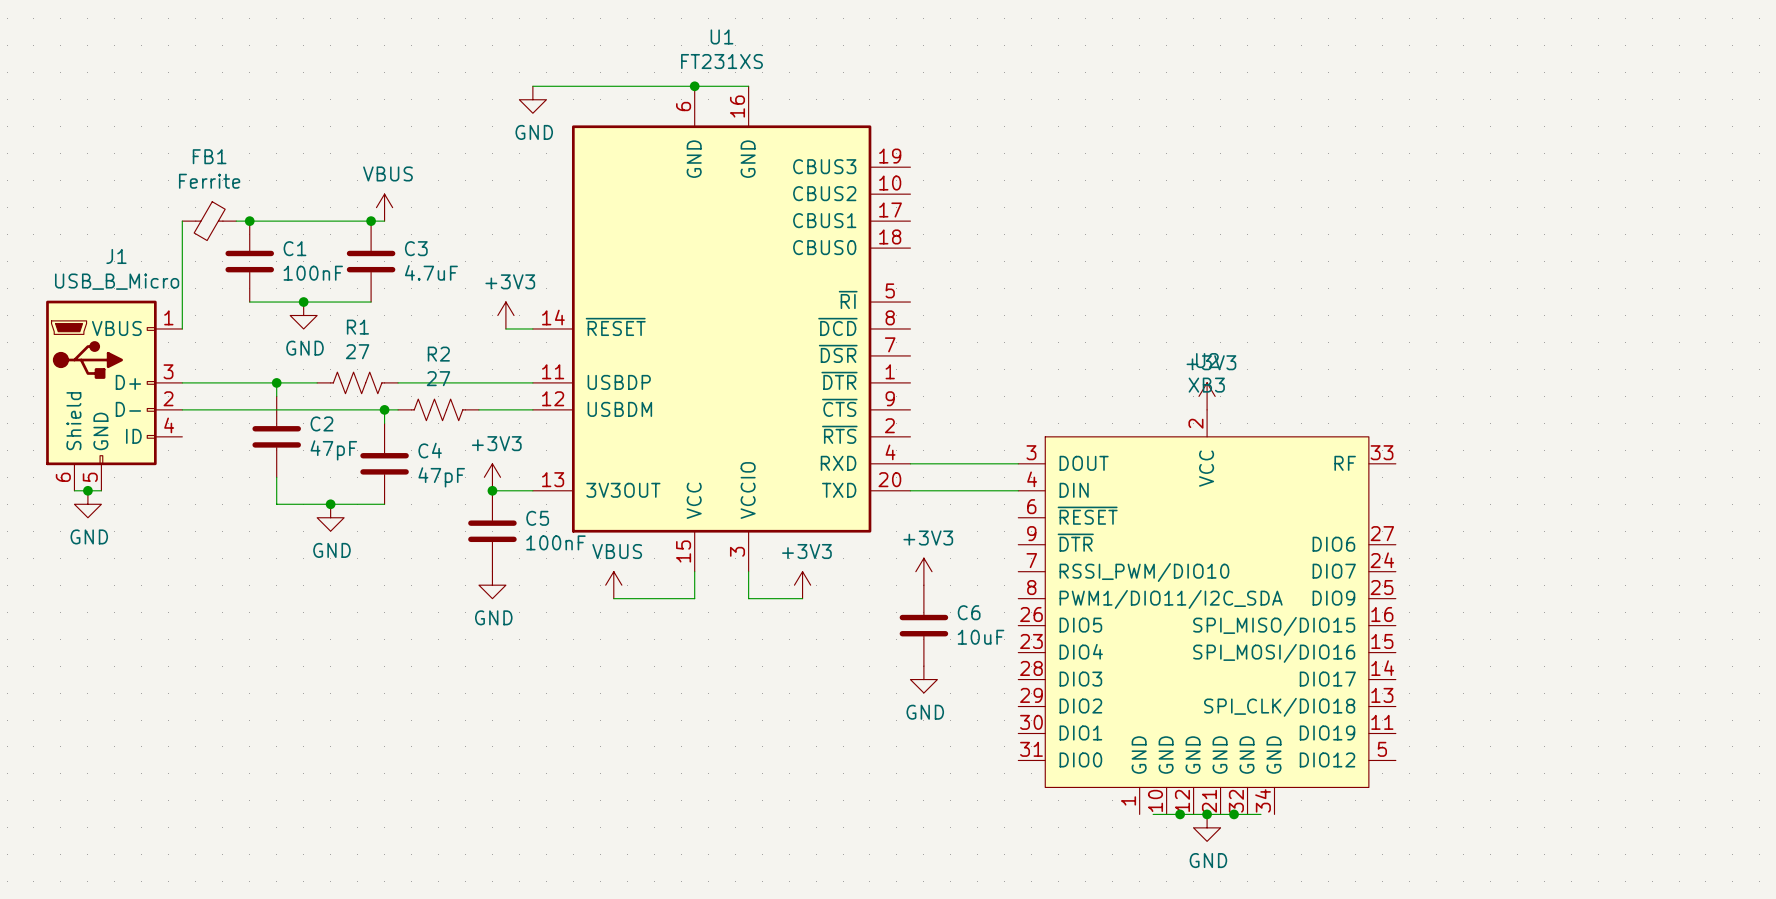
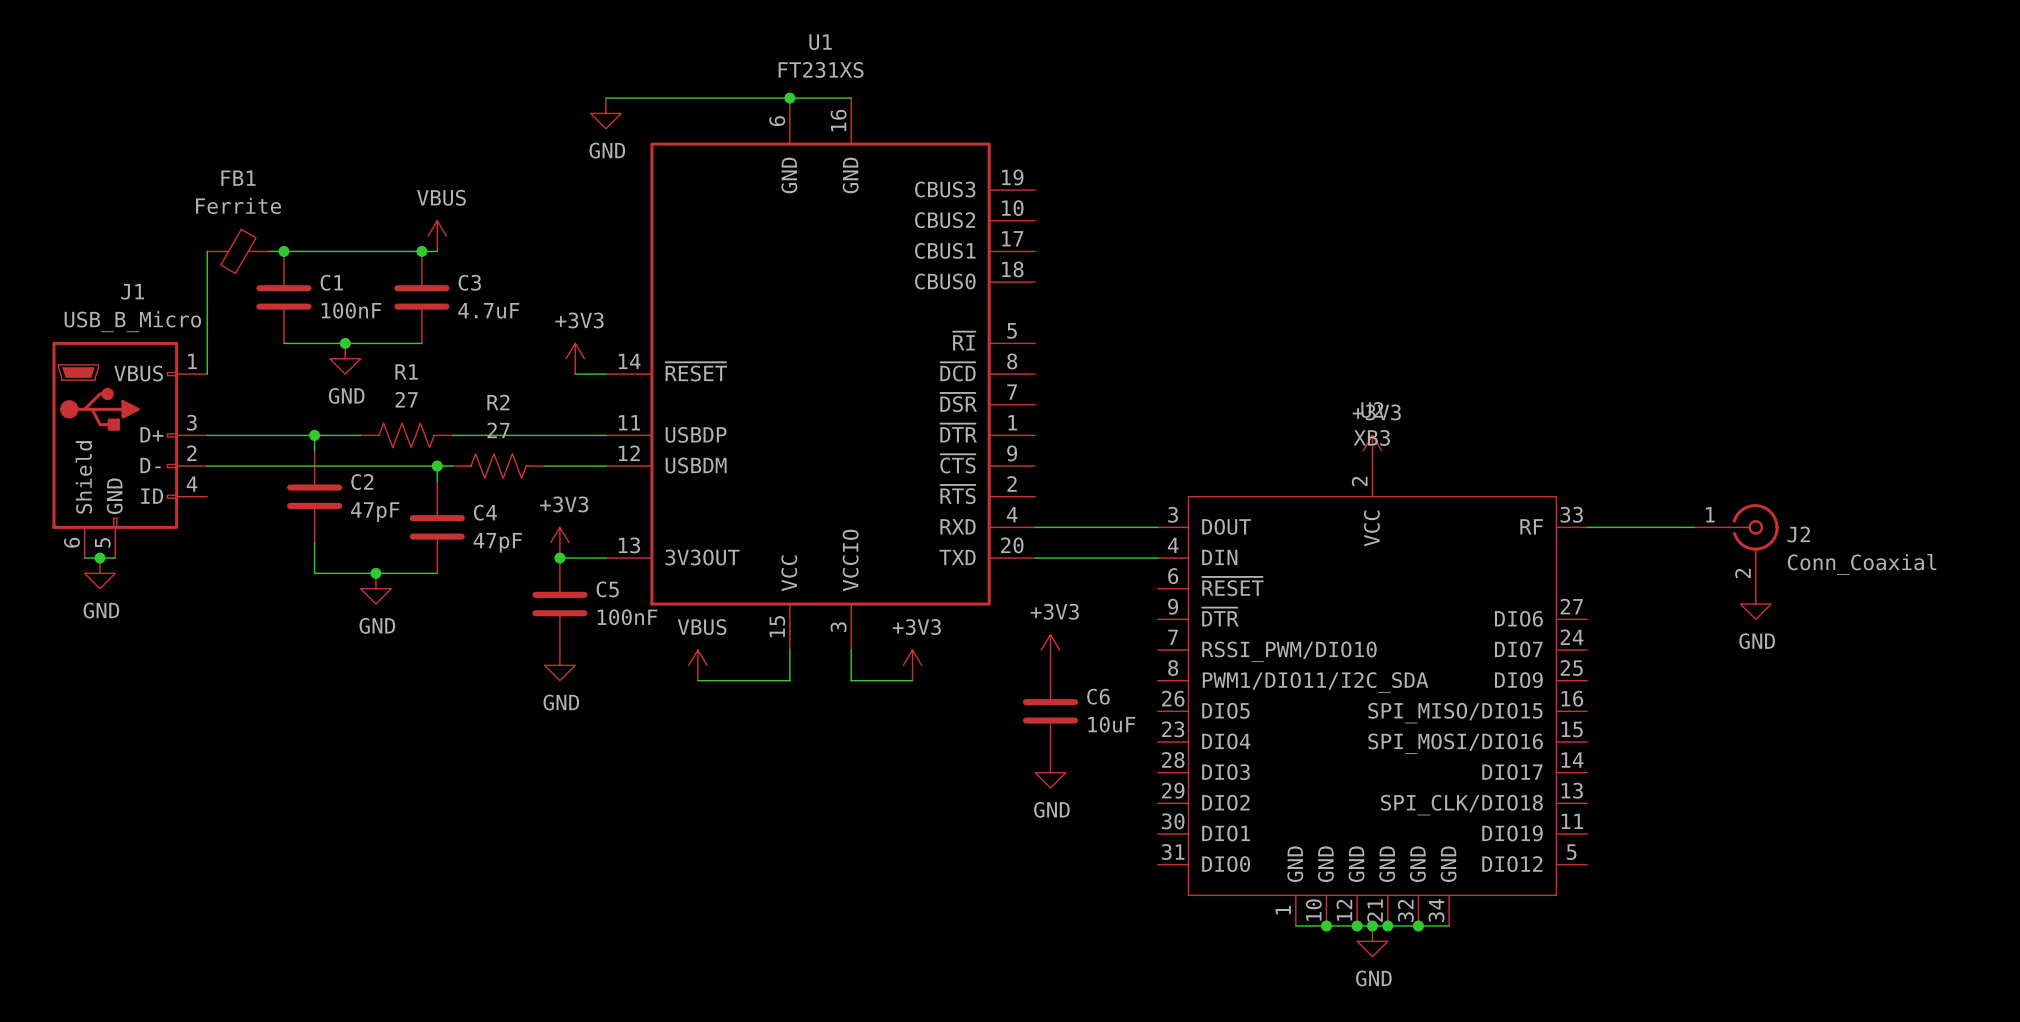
wire: none -> (1587, 527) (1694, 527)
J2: none -> Conn_Coaxial (1736, 546)
power symbol: none -> GND (1755, 604)
wire: none -> (1295, 926) (1311, 926)
junction: none -> (1326, 926)
junction: (1180, 814) -> none
junction: none -> (1357, 926)
junction: none -> (1387, 926)
junction: (1234, 814) -> none
junction: none -> (1418, 926)
wire: none -> (1433, 926) (1449, 926)

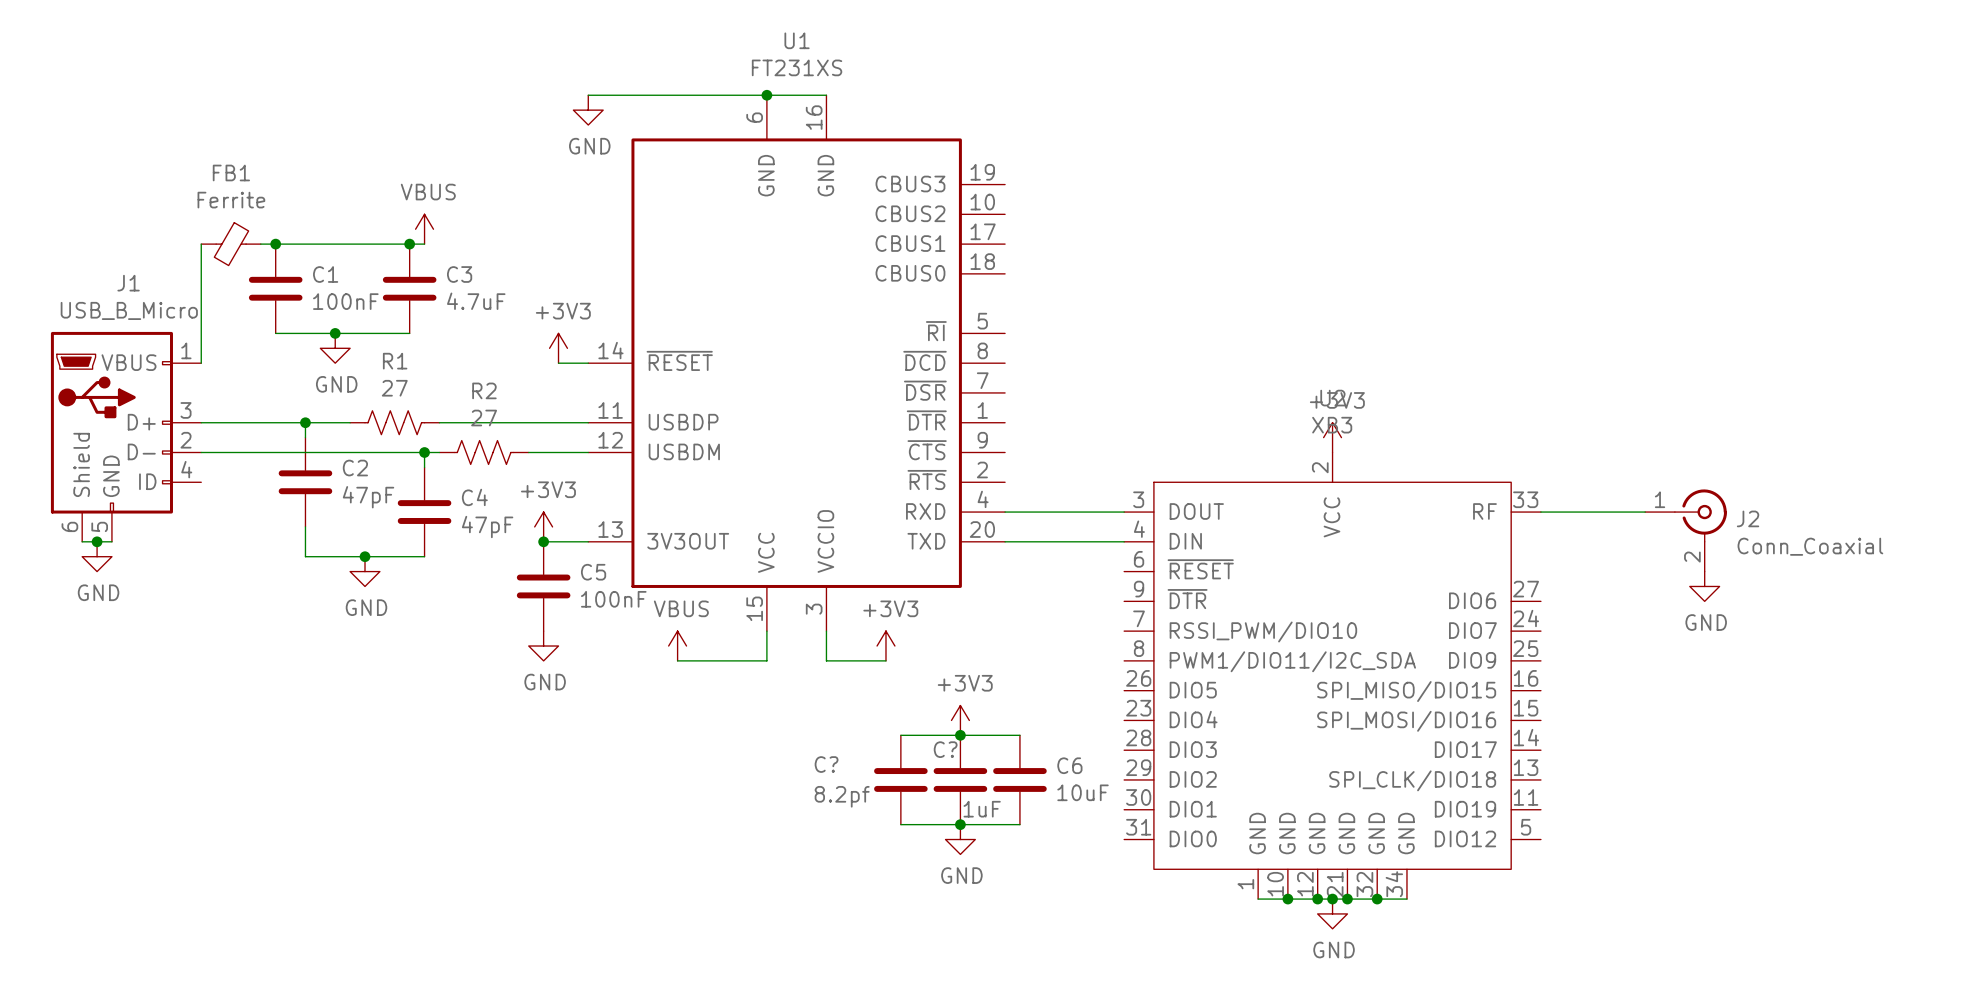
power symbol position: +3V3 (1050, 650) -> +3V3 (960, 720)
C6 position: (1050, 711) -> (1019, 779)
wire: none -> (900, 735) (1019, 735)
junction: none -> (960, 735)
power symbol position: GND (1050, 772) -> GND (960, 839)
C?: none -> 8.2pf (900, 779)
C?: none -> 1uF (960, 779)
wire: none -> (900, 824) (1019, 824)
junction: none -> (960, 824)

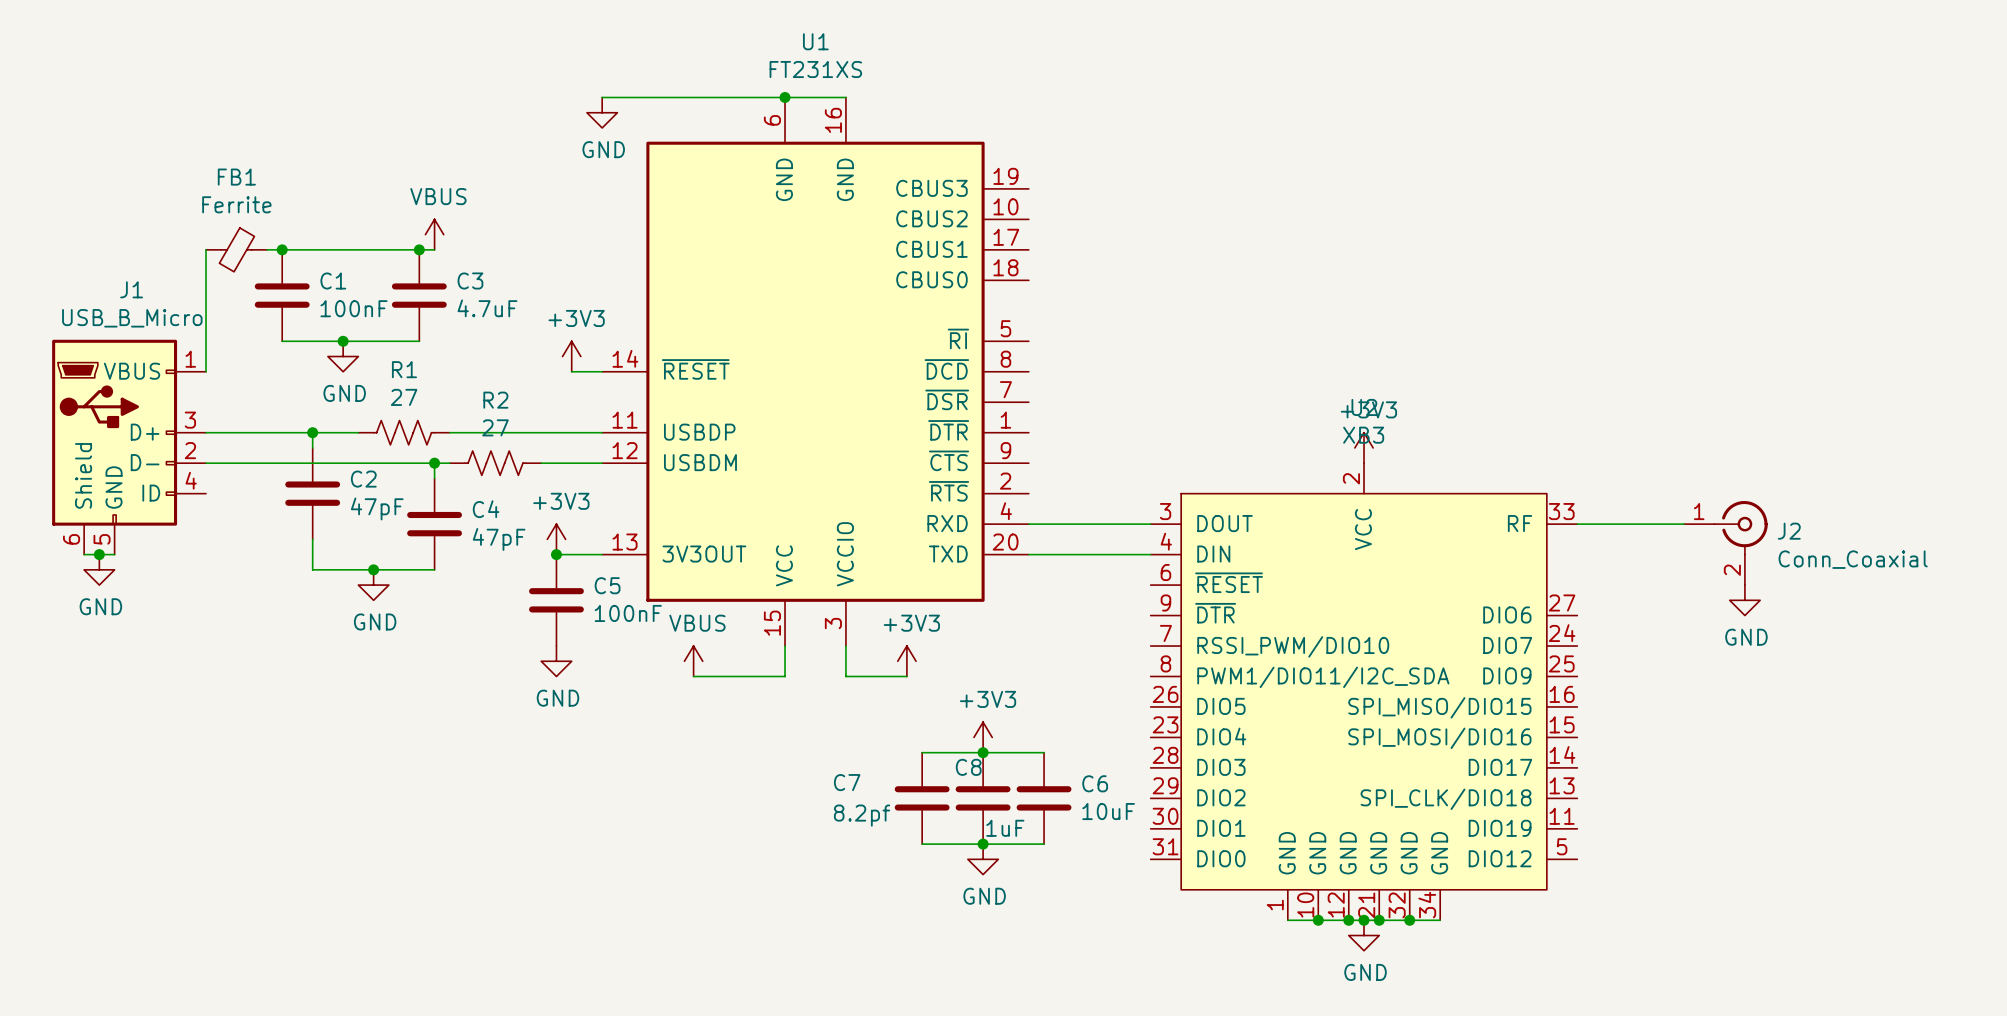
C? name: C? (945, 749) -> C8 (968, 767)
C? name: C? (826, 764) -> C7 (847, 782)

